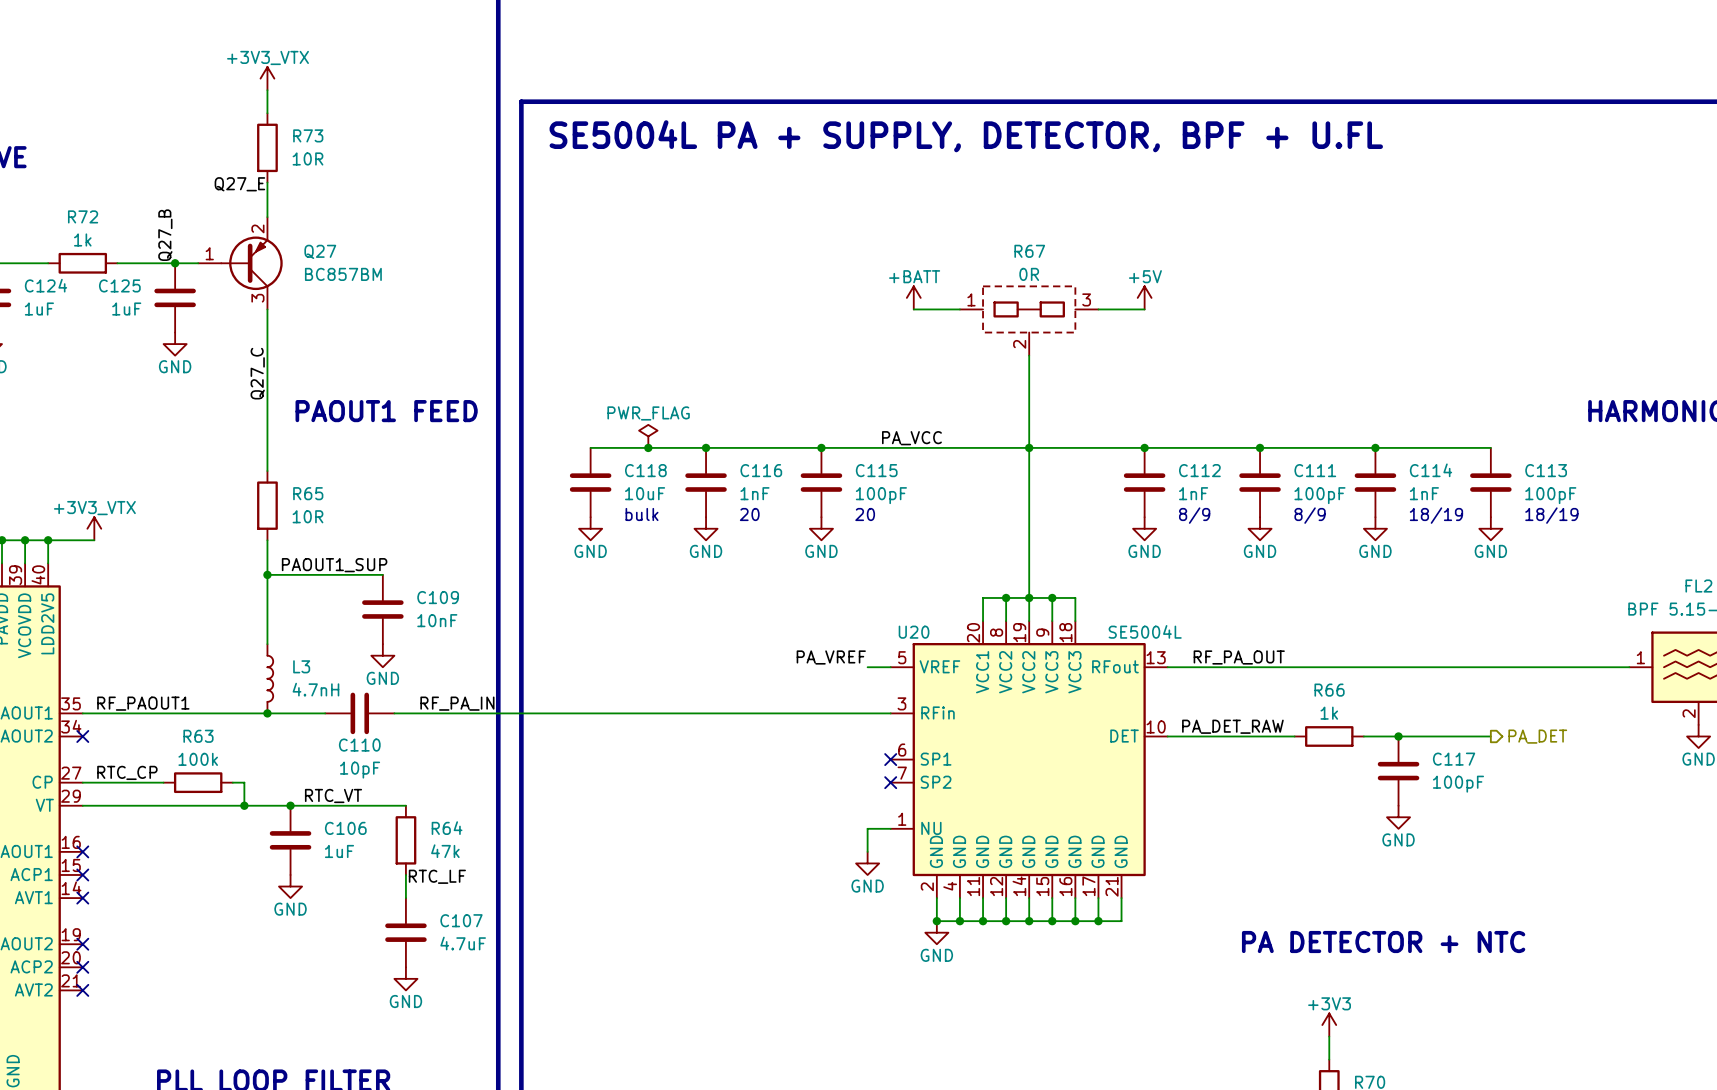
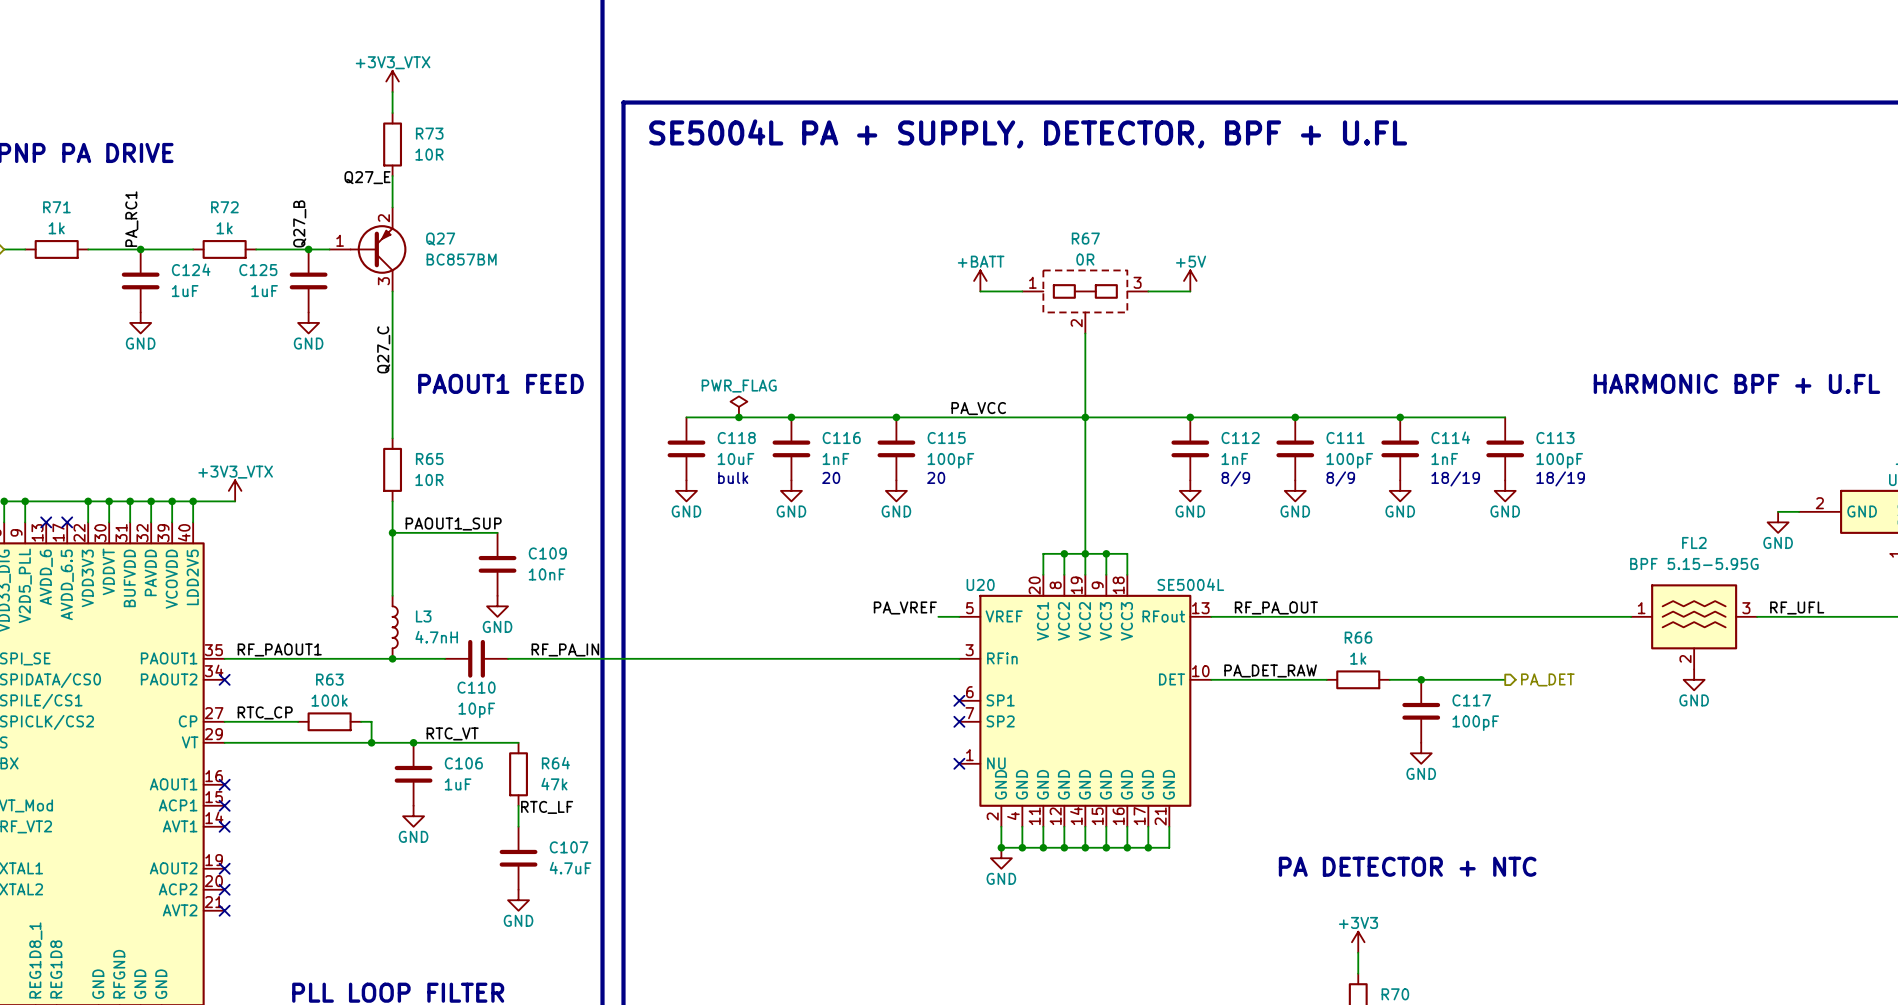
wire: (890, 828) (867, 828) (867, 851) -> none
no-connect mark: none -> (959, 763)
power symbol: GND (867, 863) -> none

